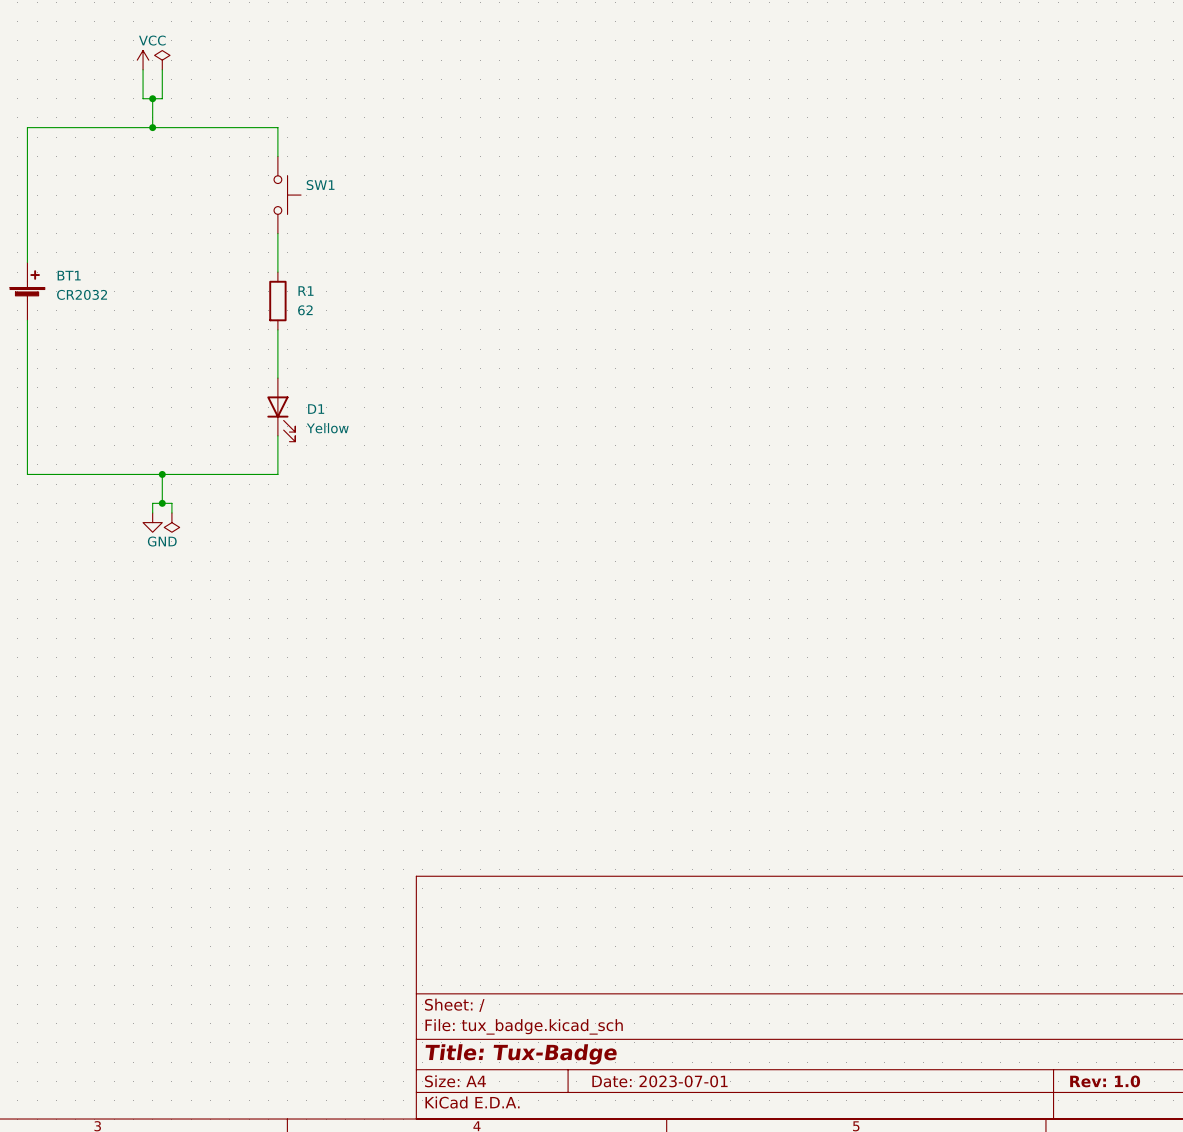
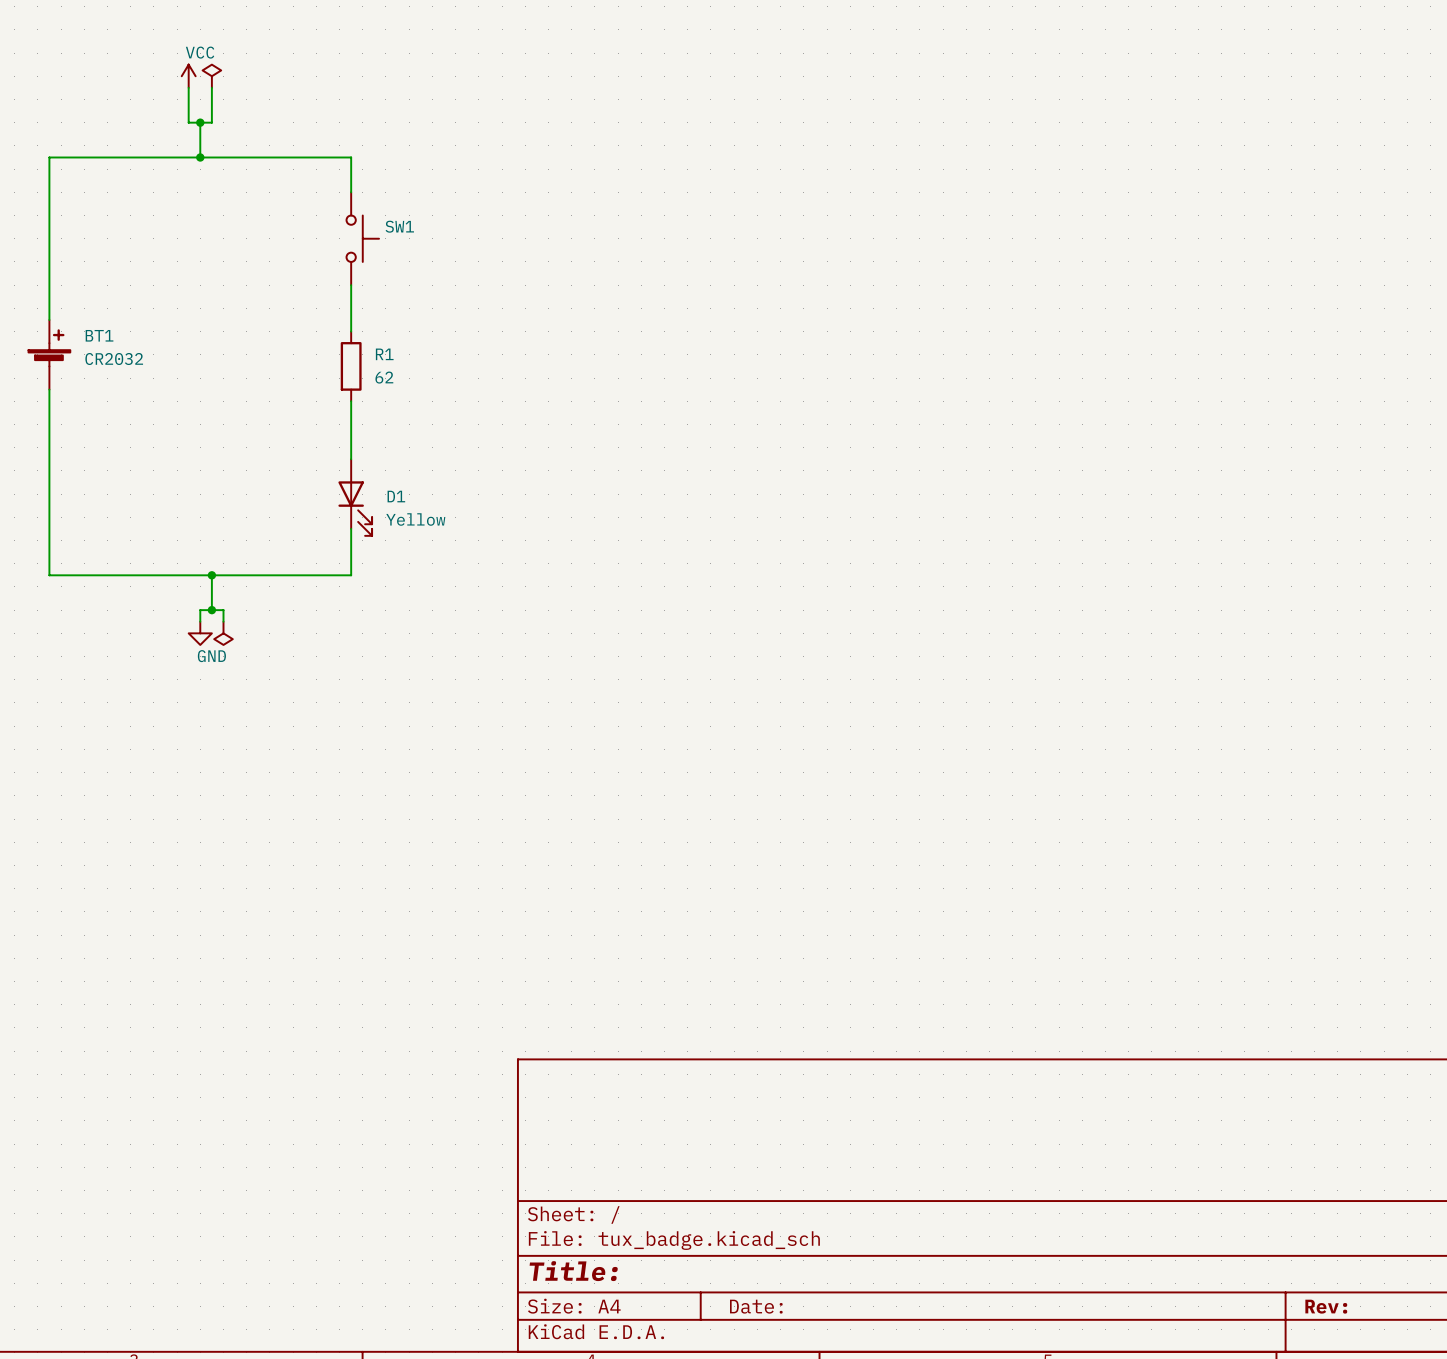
title block: Title: Tux-Badge (521, 1054) -> Title: (573, 1271)
title block: Date: 2023-07-01 (659, 1081) -> Date: (756, 1306)
title block: Rev: 1.0 (1105, 1081) -> Rev: (1326, 1306)

